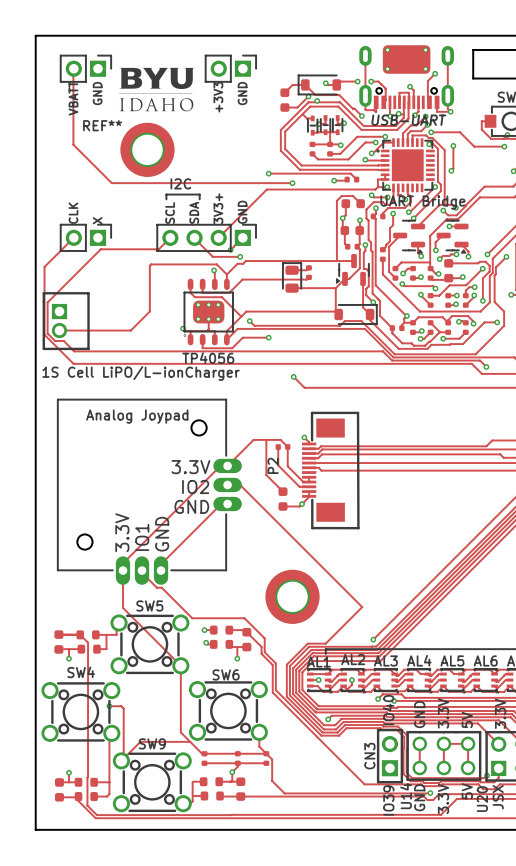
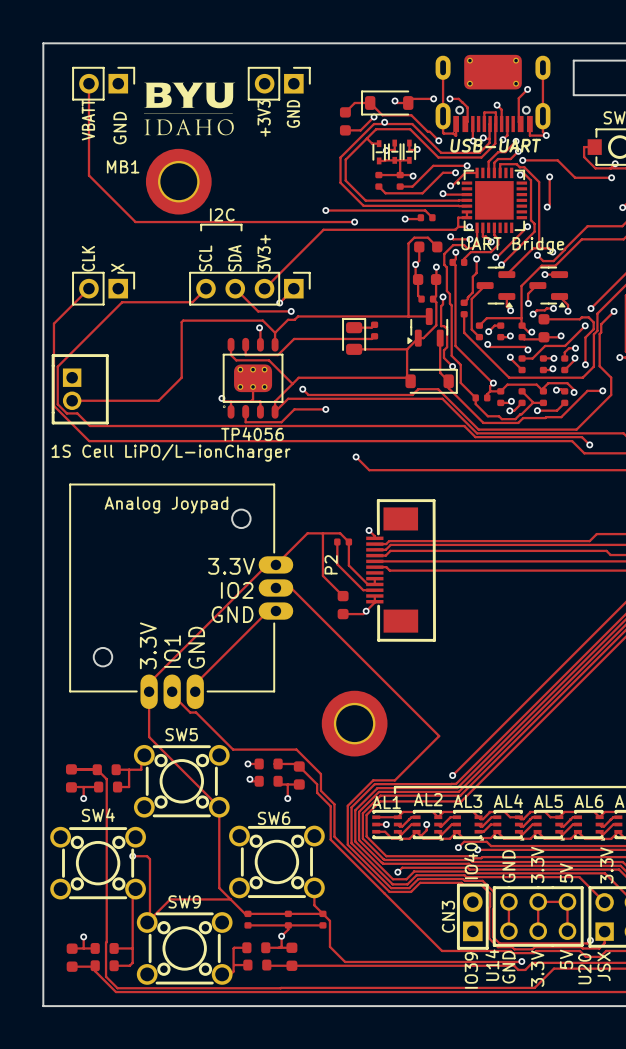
part: (85, 68) -> none
part: (230, 68) -> none
REF**: (159, 133) -> none
MB1: none -> (191, 186)
part: (85, 237) -> none
part: (206, 237) -> none

